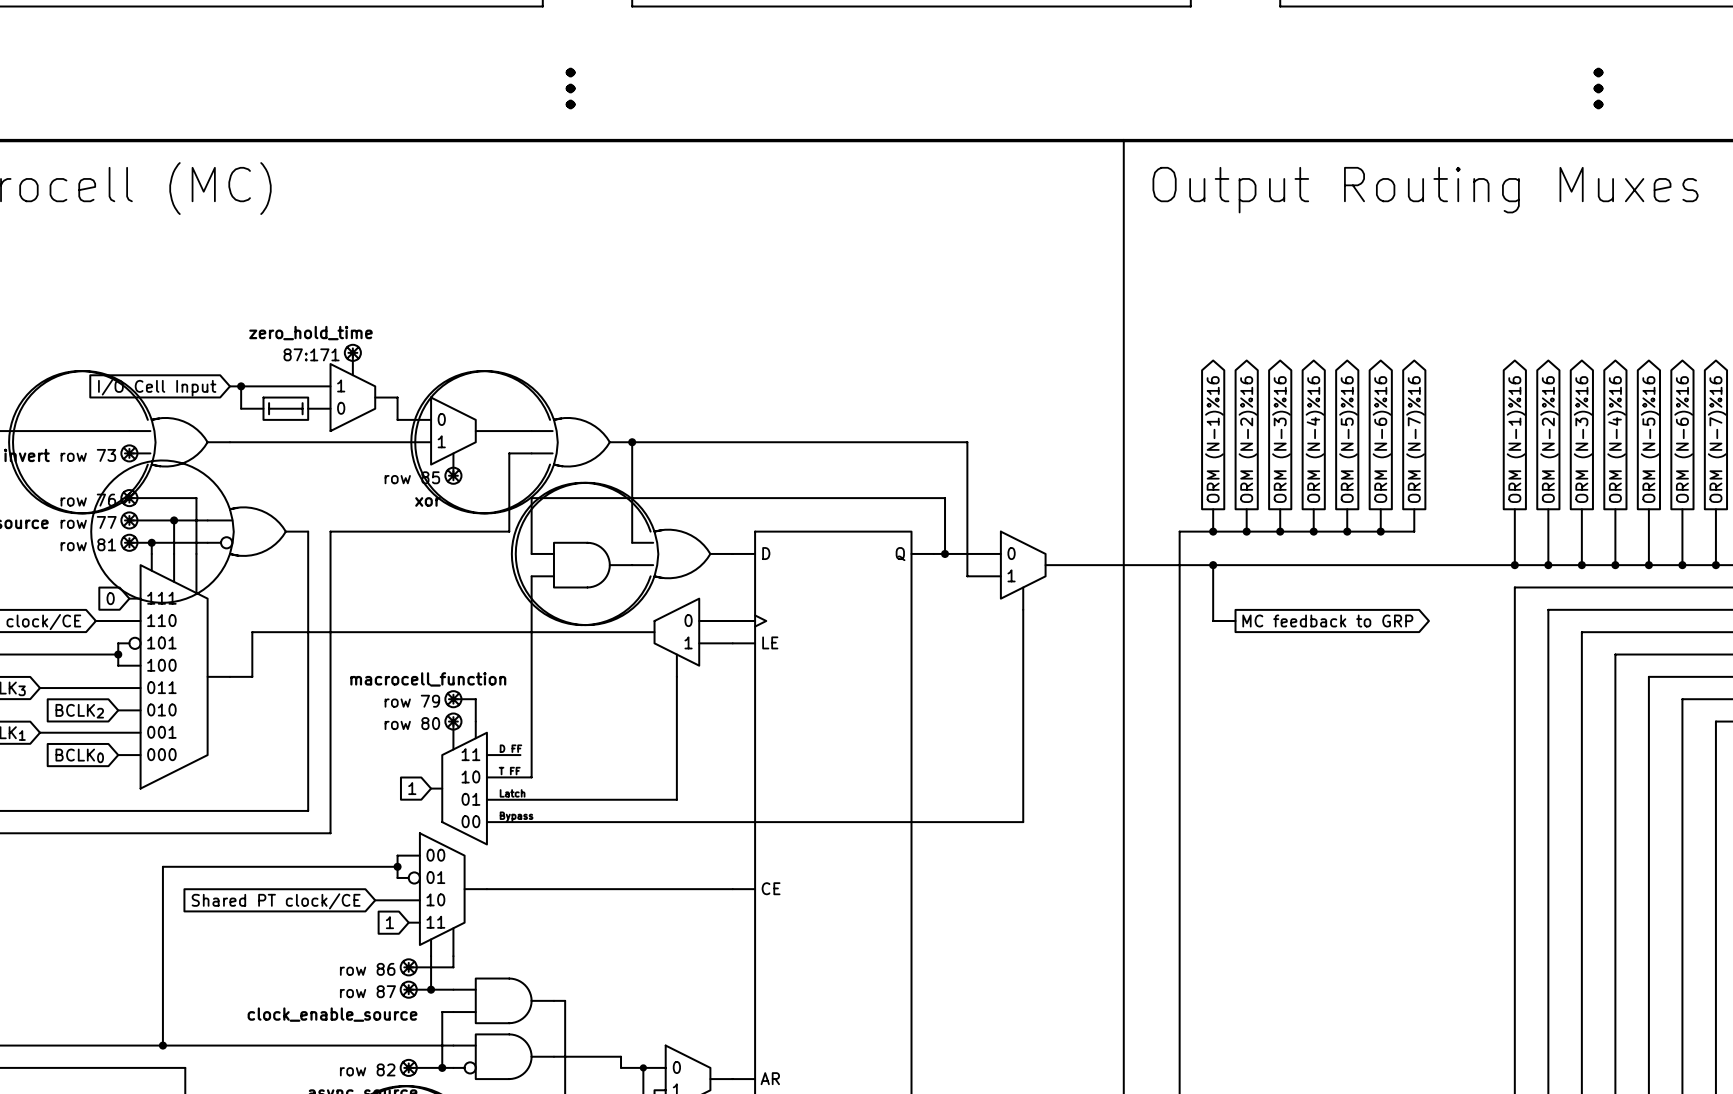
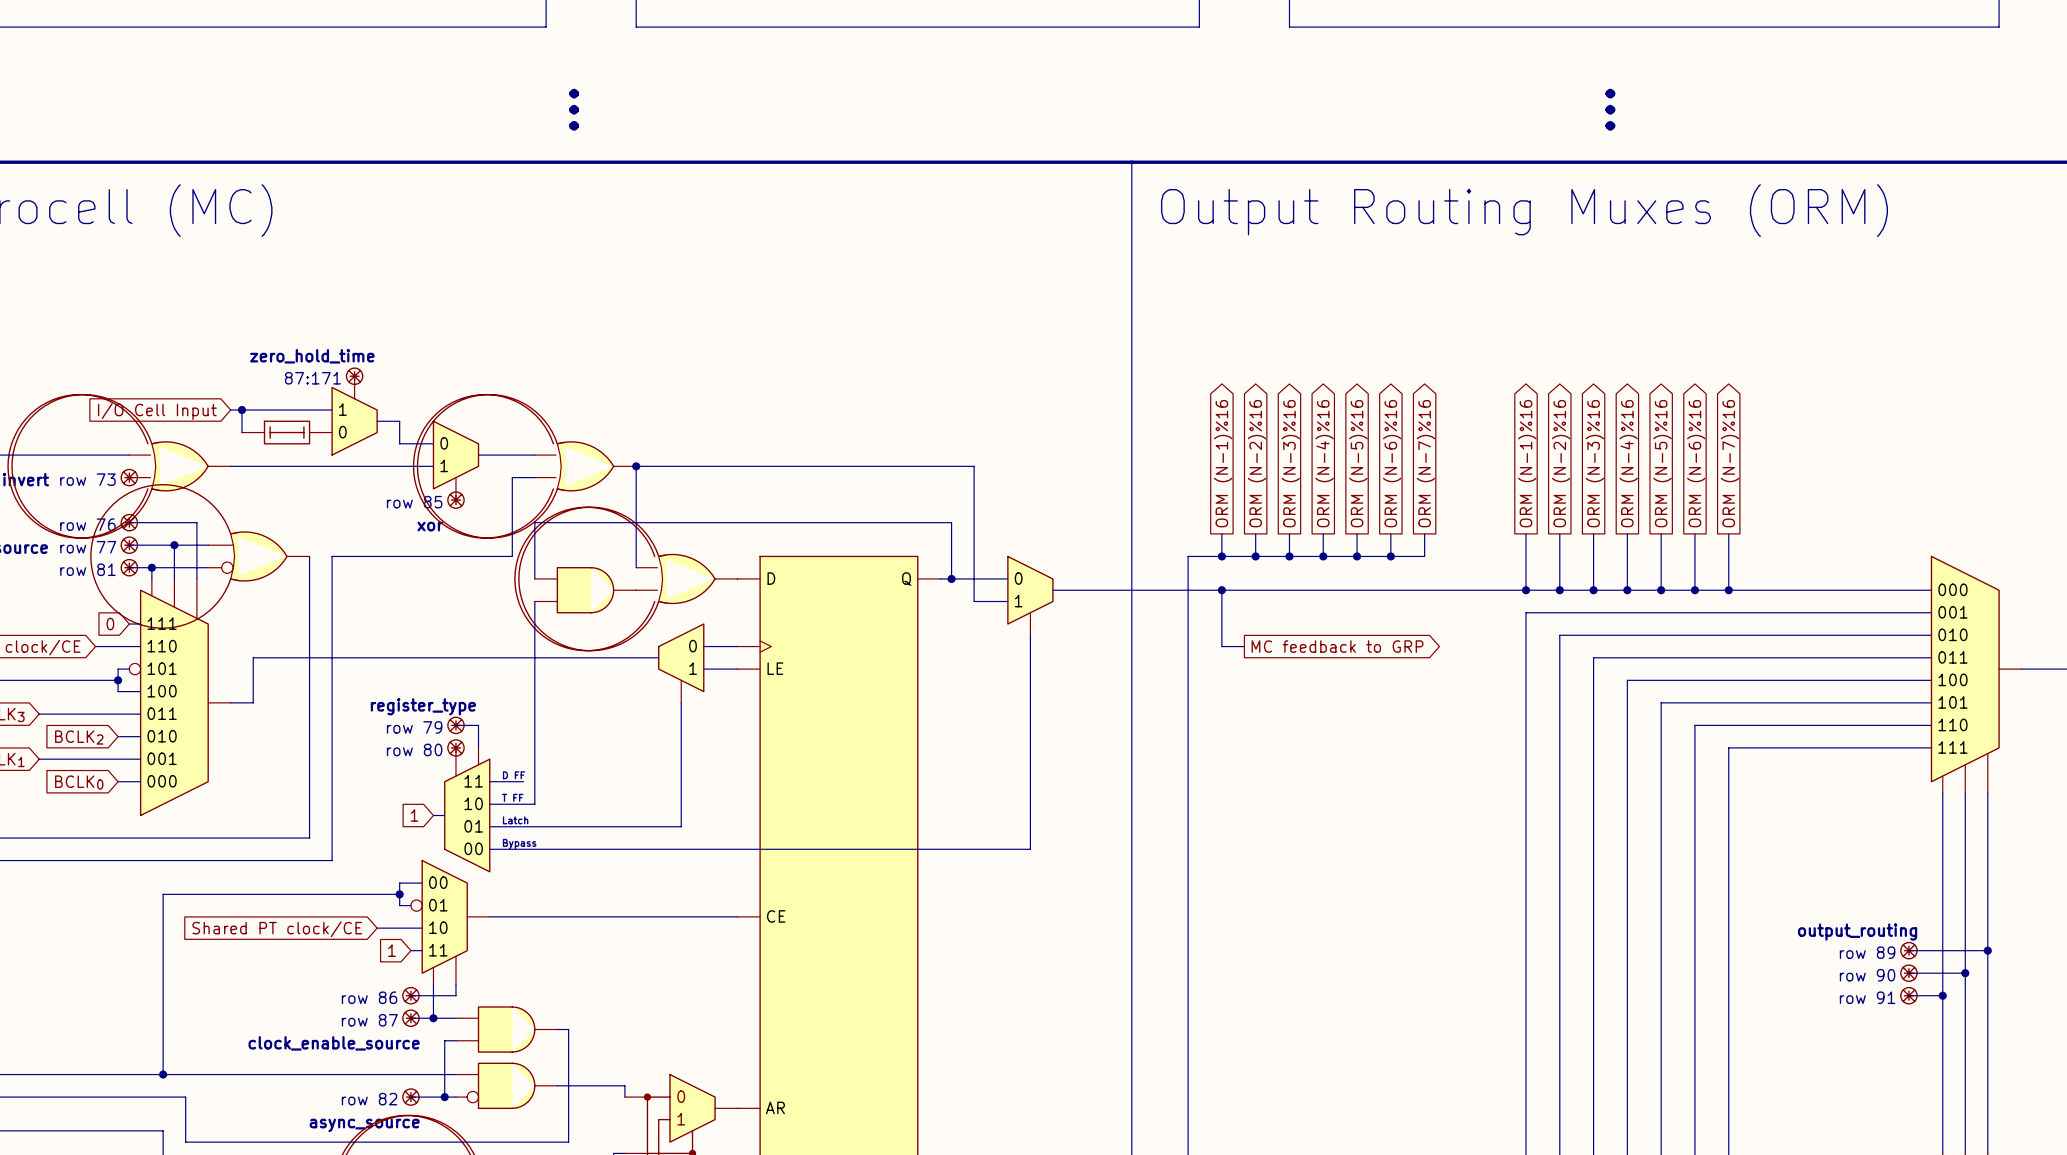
text: macrocell_function (428, 679) -> none
text: none -> register_type (423, 706)

